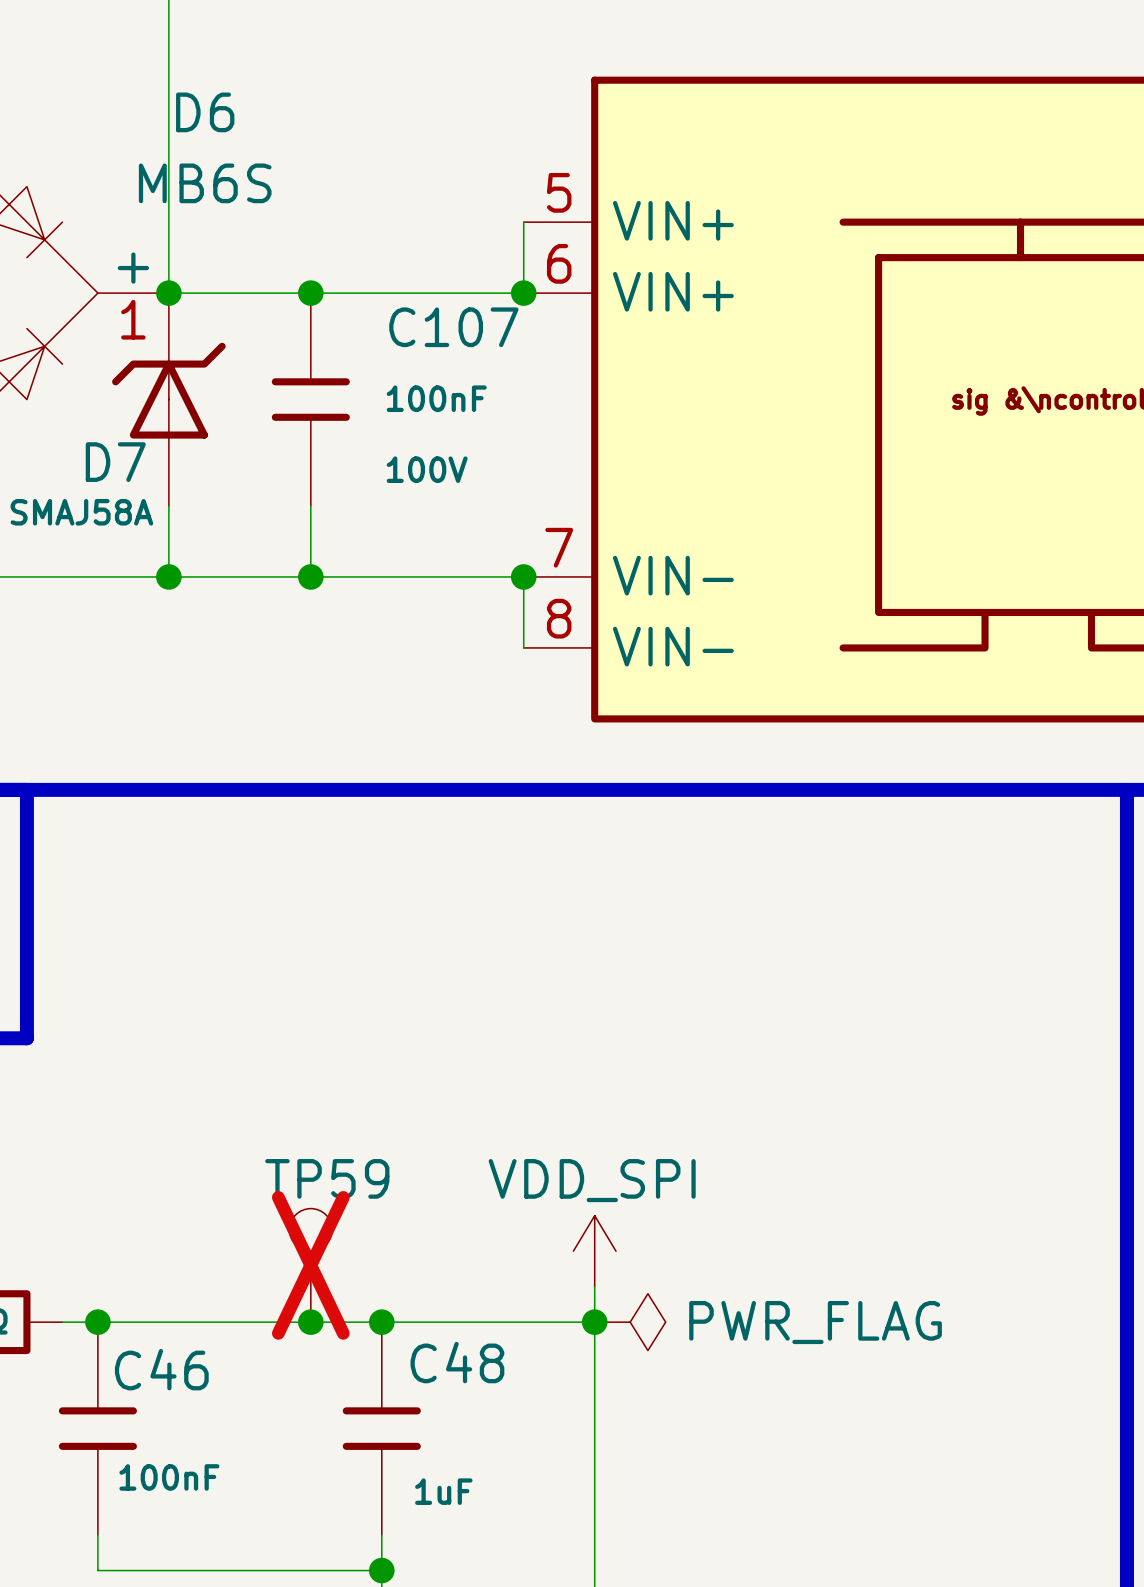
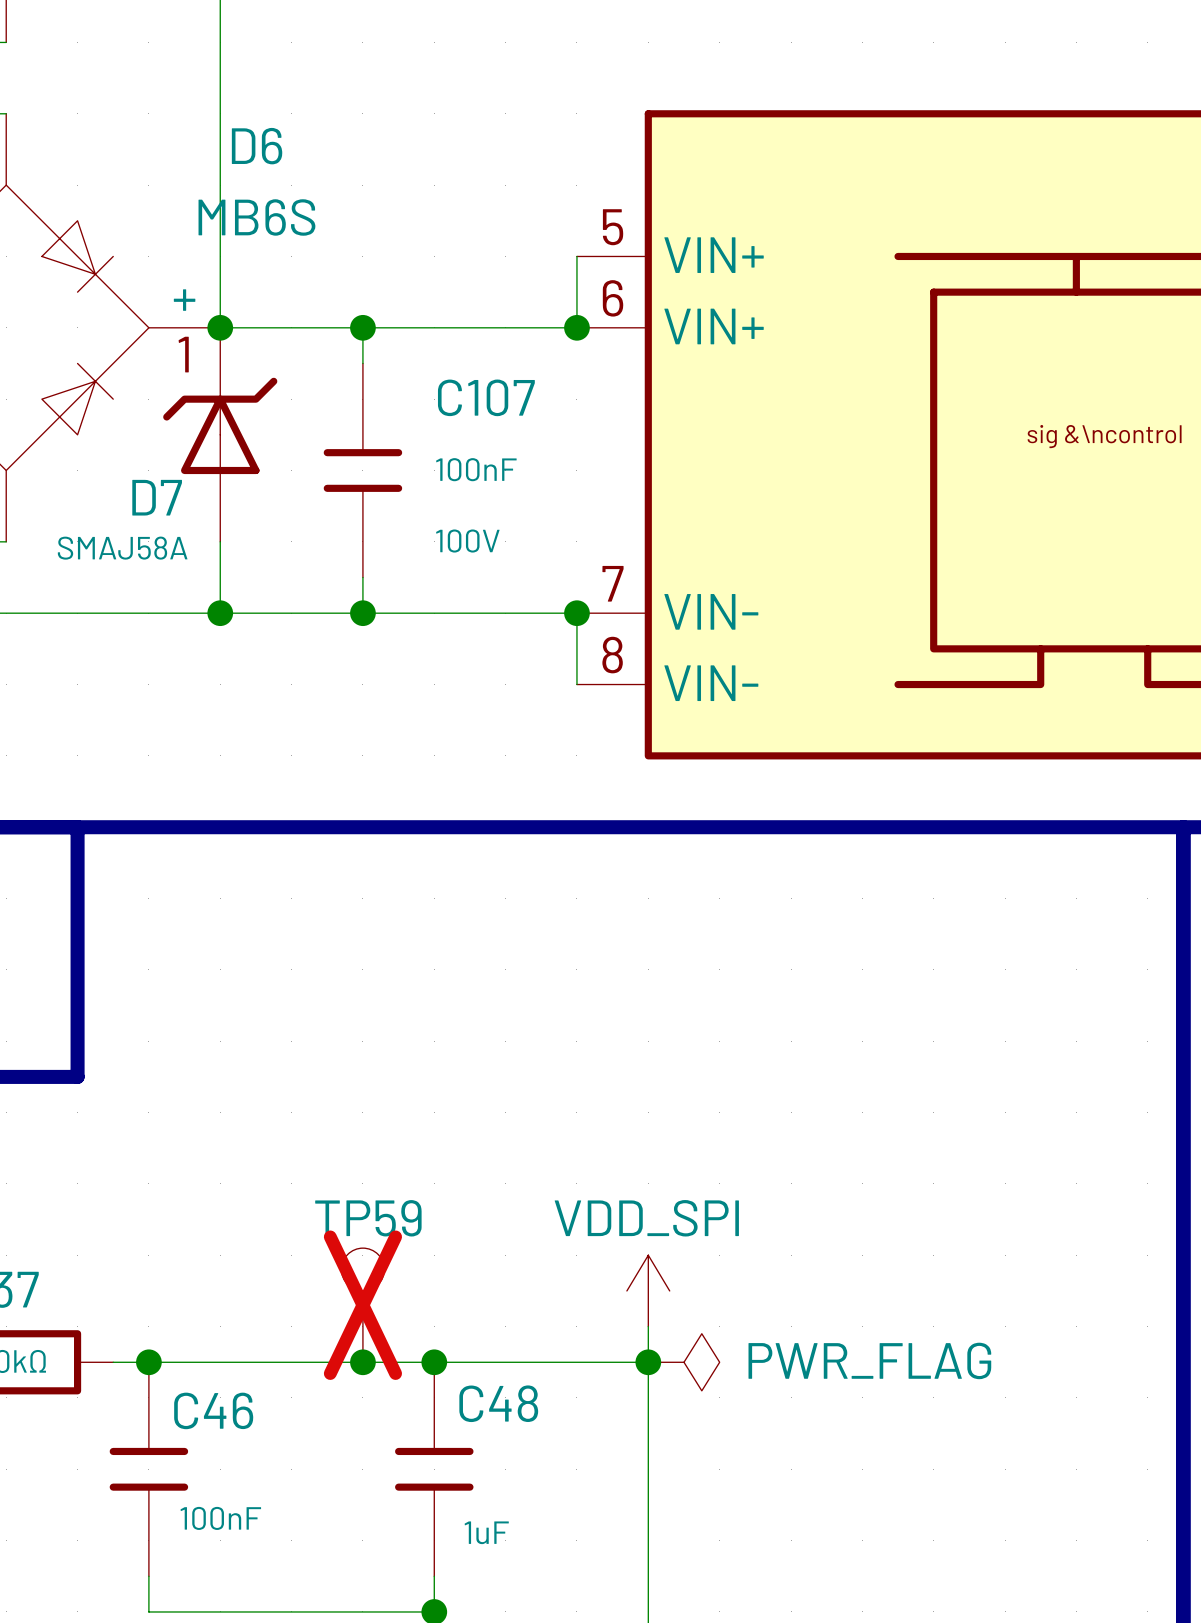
C107 position: (310, 399) -> (362, 470)

